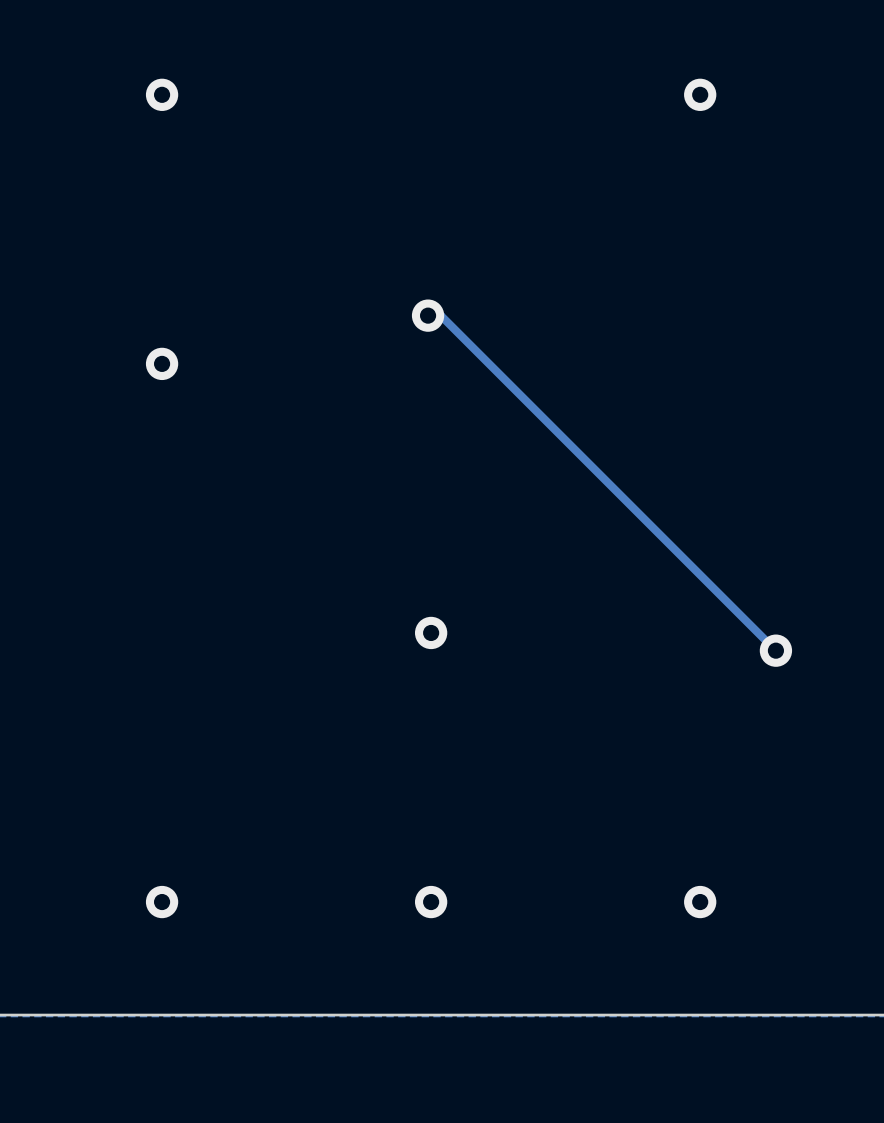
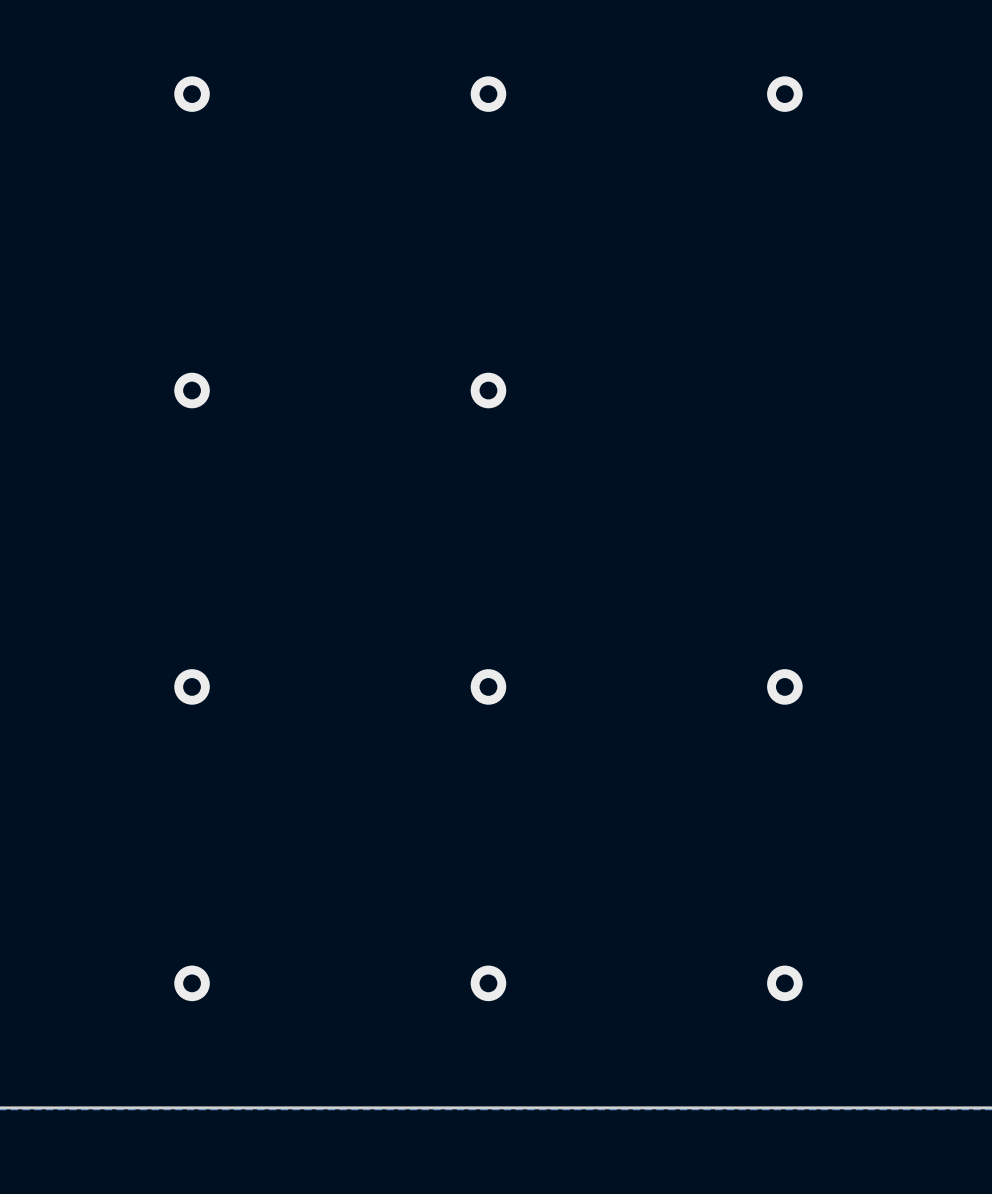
via: none -> (488, 94)
track: (428, 315) (440, 315) (775, 650) -> none
via position: (428, 315) -> (488, 390)
via: none -> (192, 686)
via position: (775, 650) -> (784, 686)

